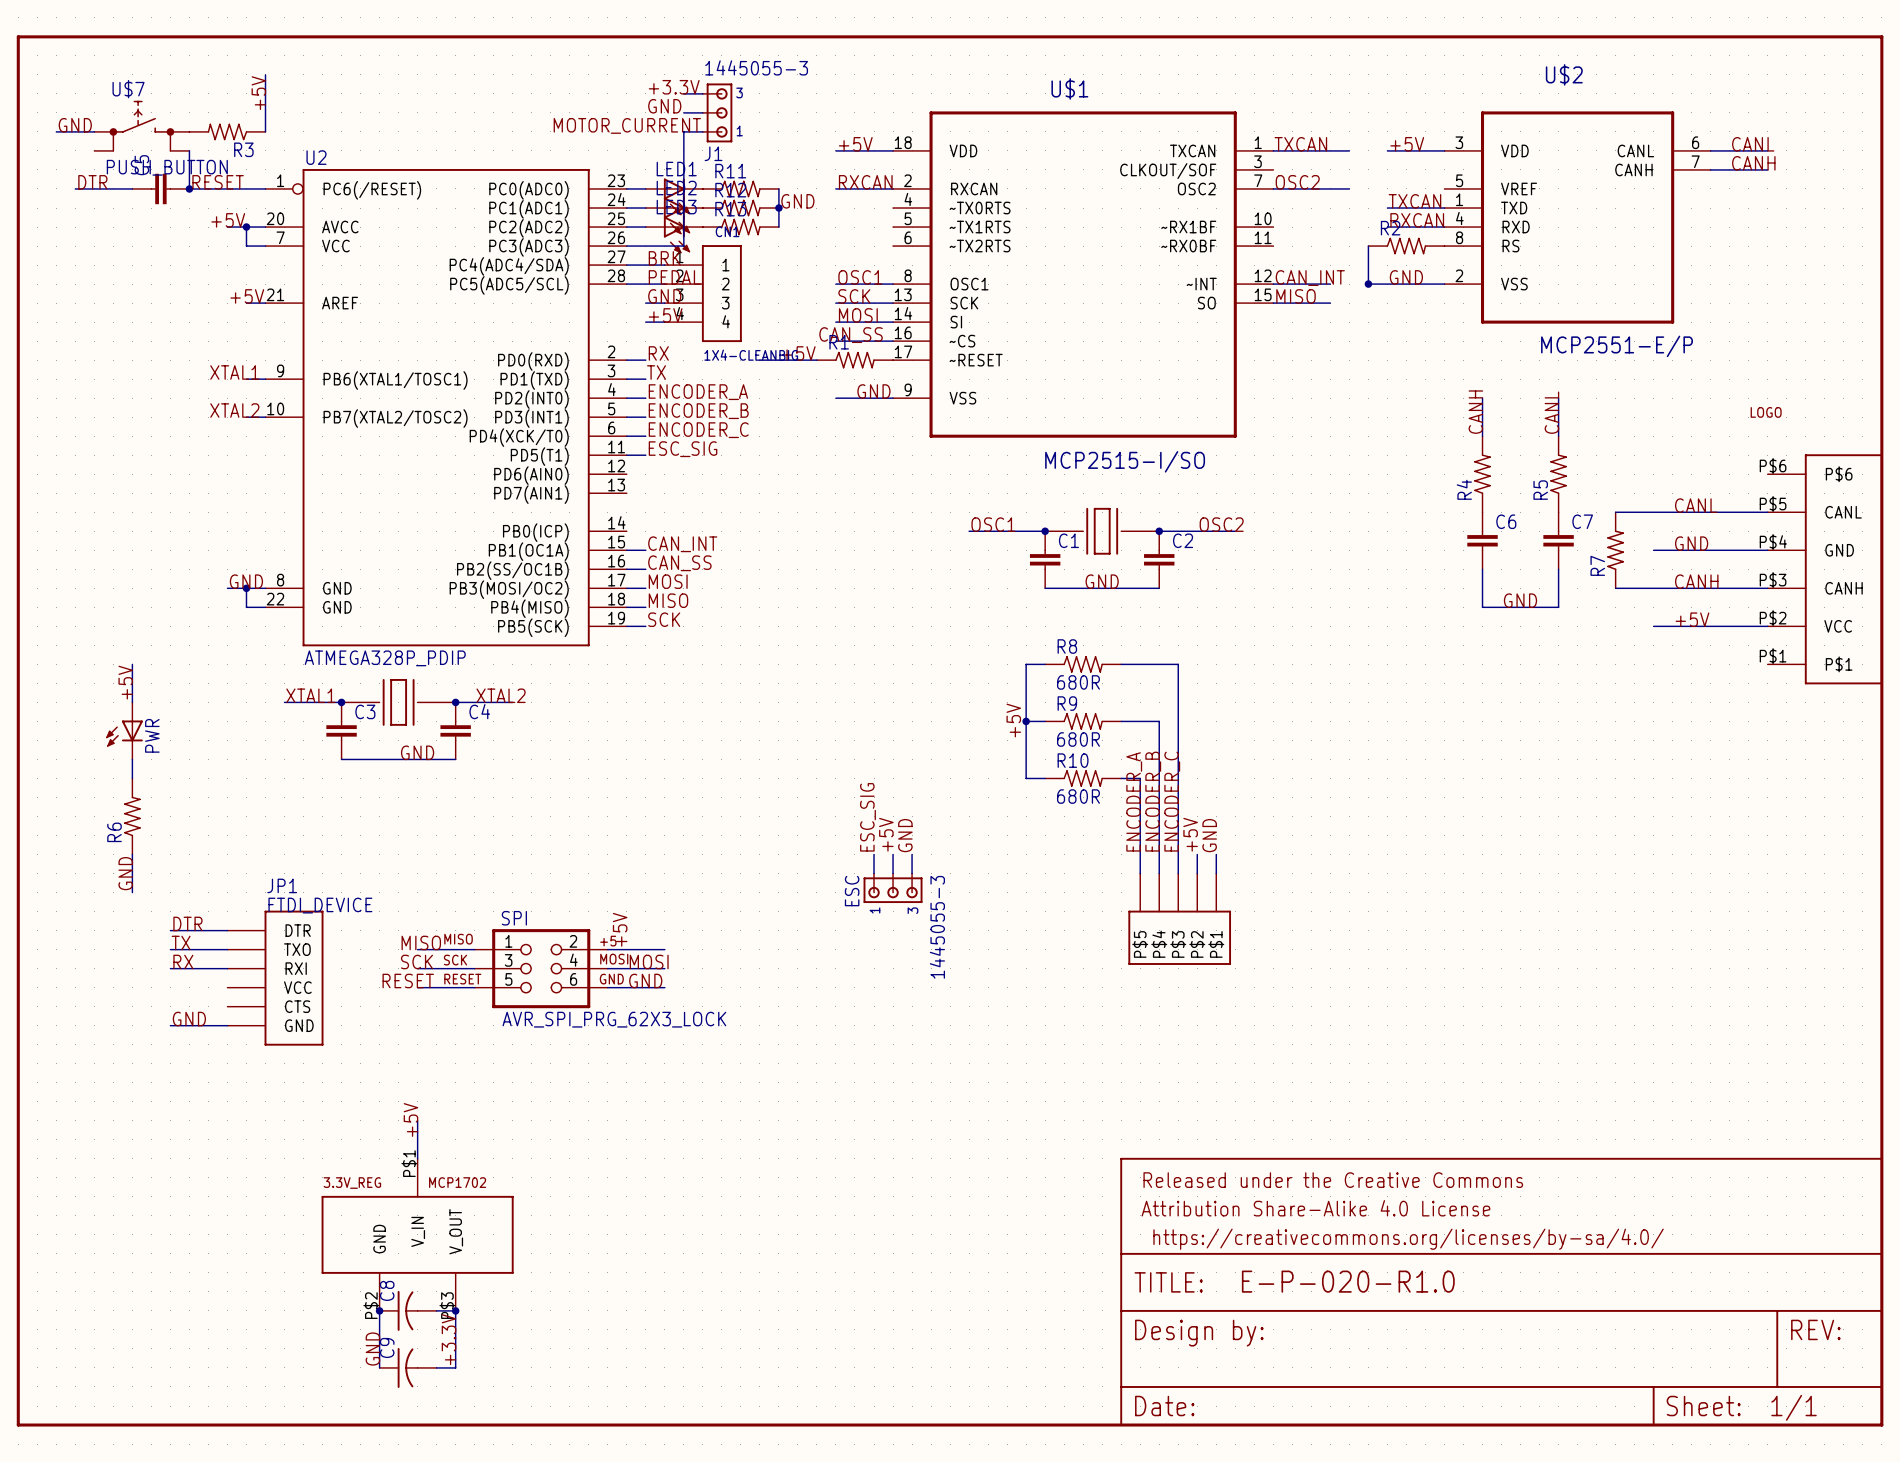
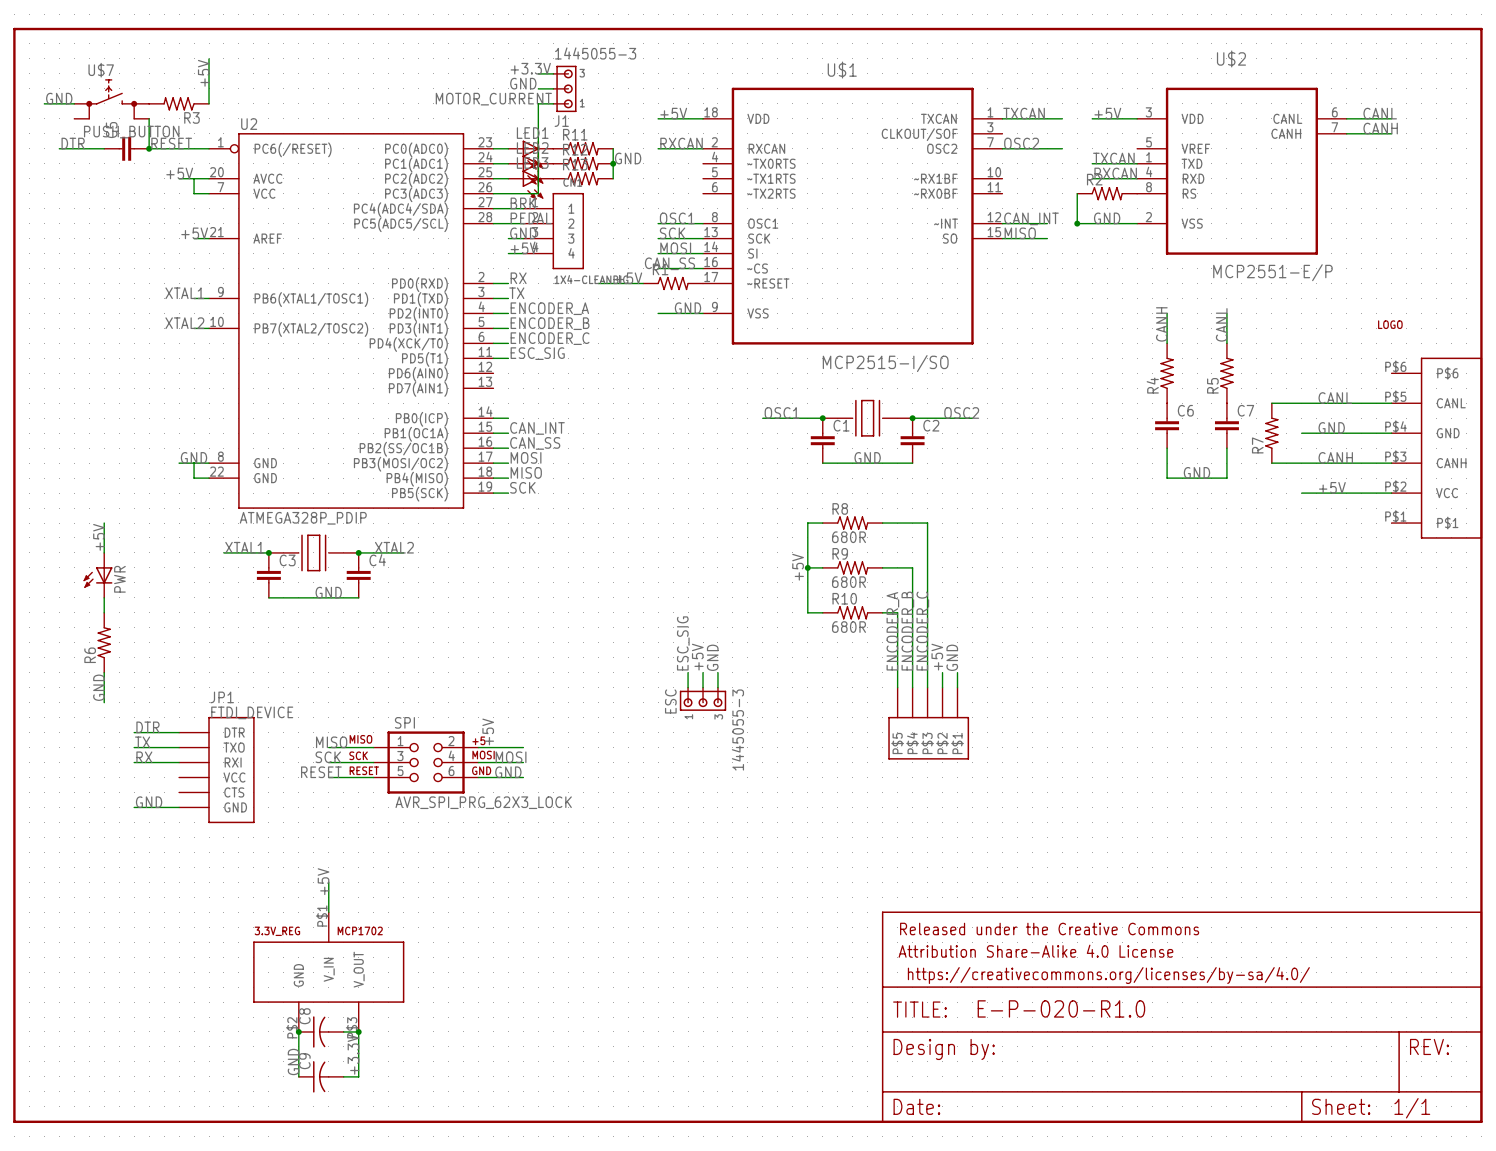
junction: (246, 227) -> none
wire: none -> (493, 418) (508, 418)
junction: (246, 588) -> none

